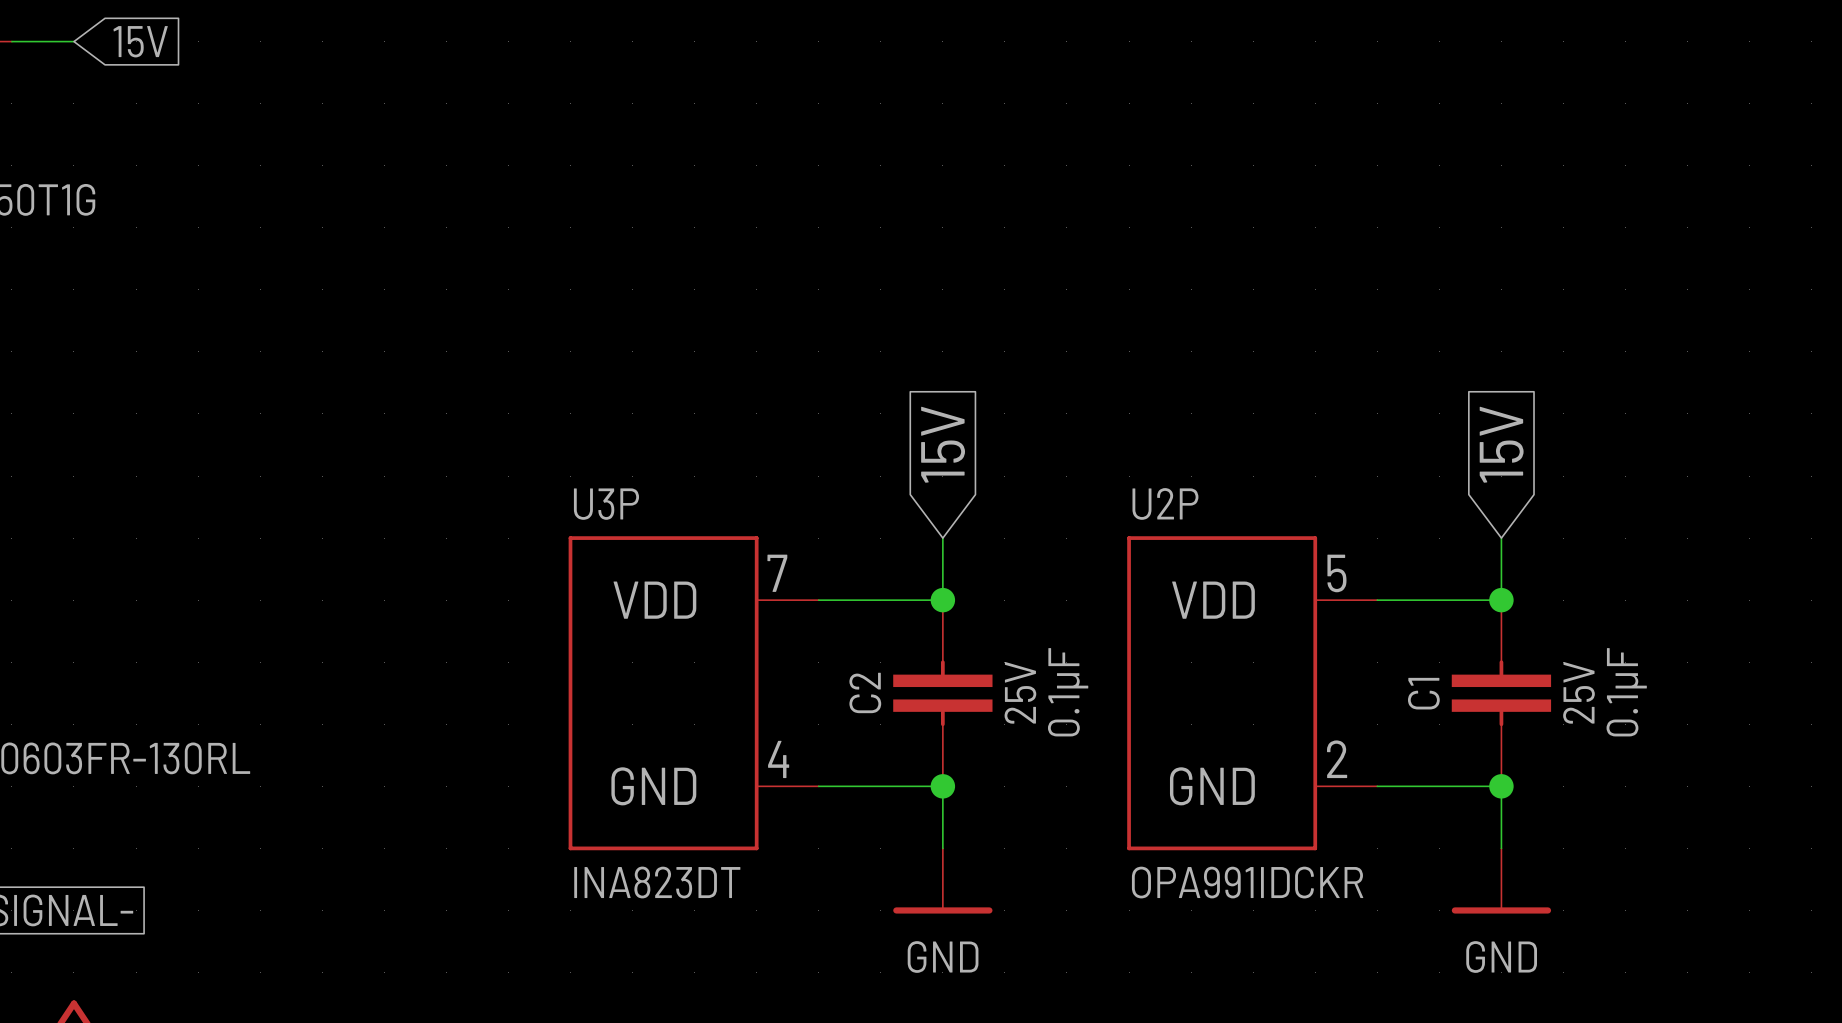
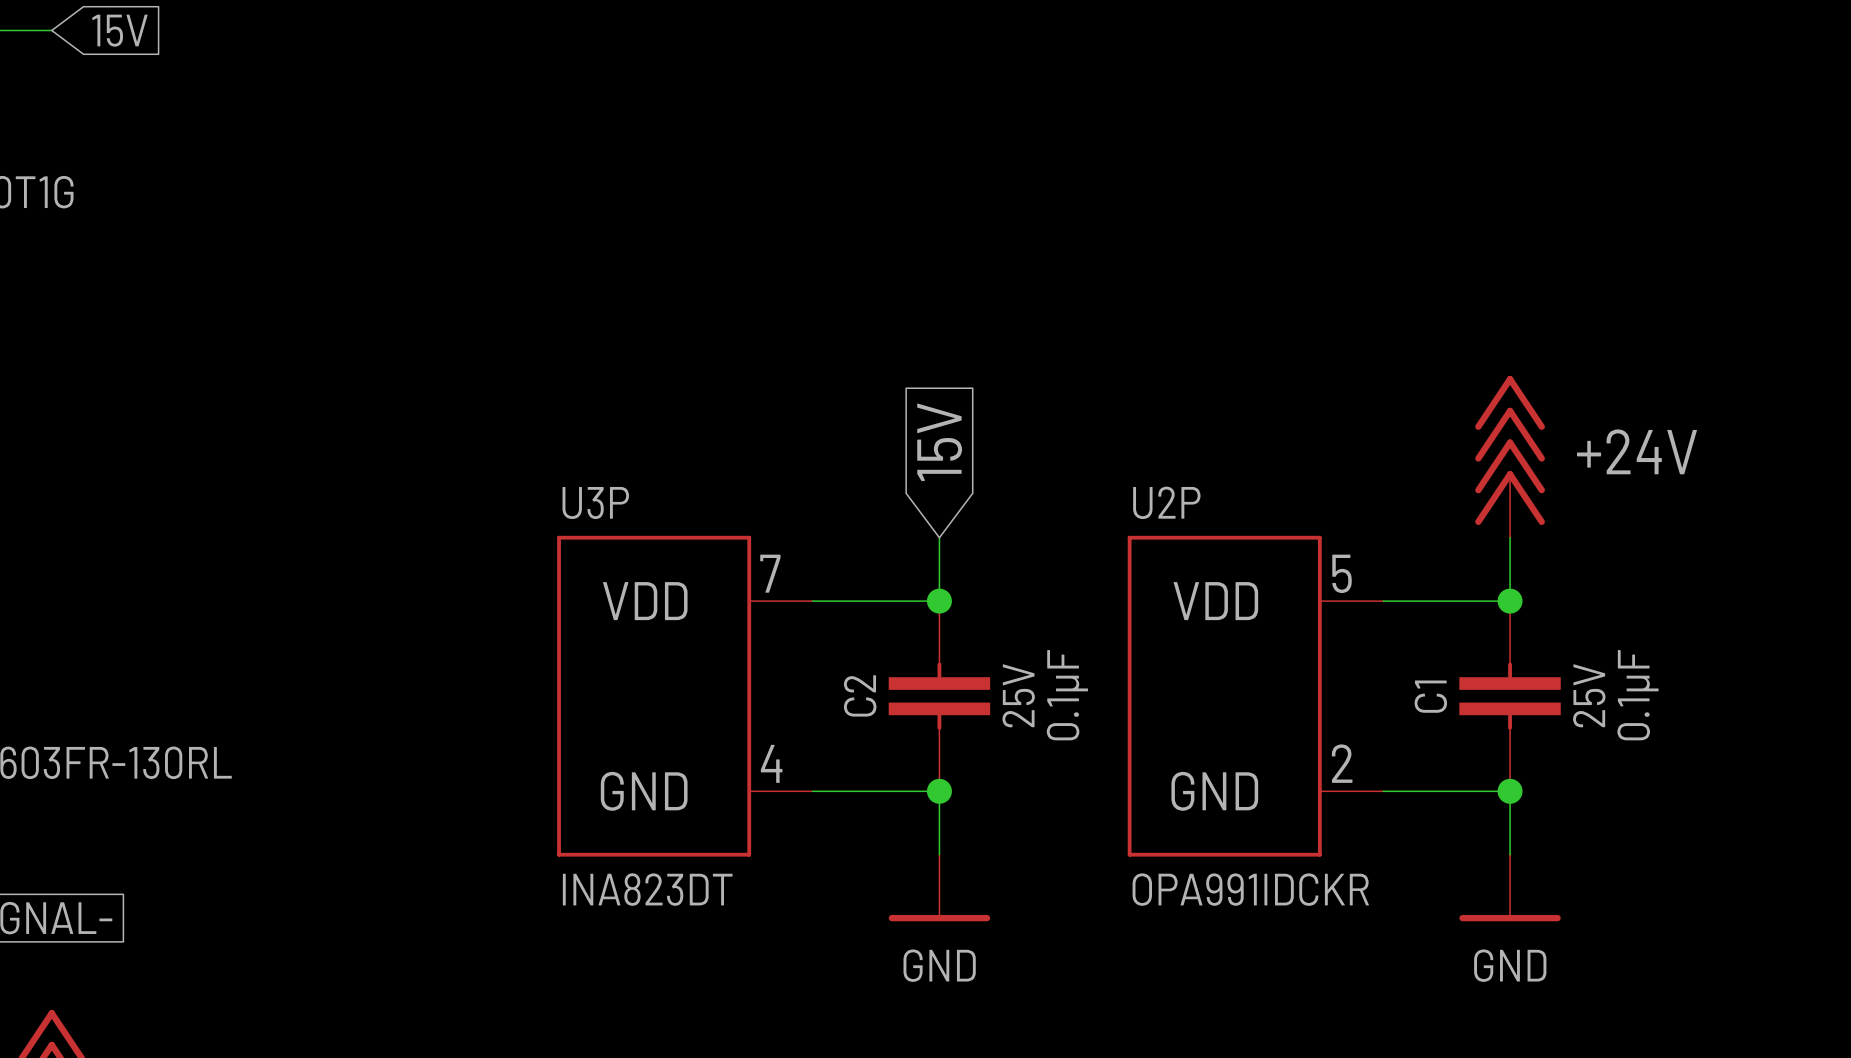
global label: 15V (1501, 444) -> none
power symbol: none -> +24V (1510, 456)

